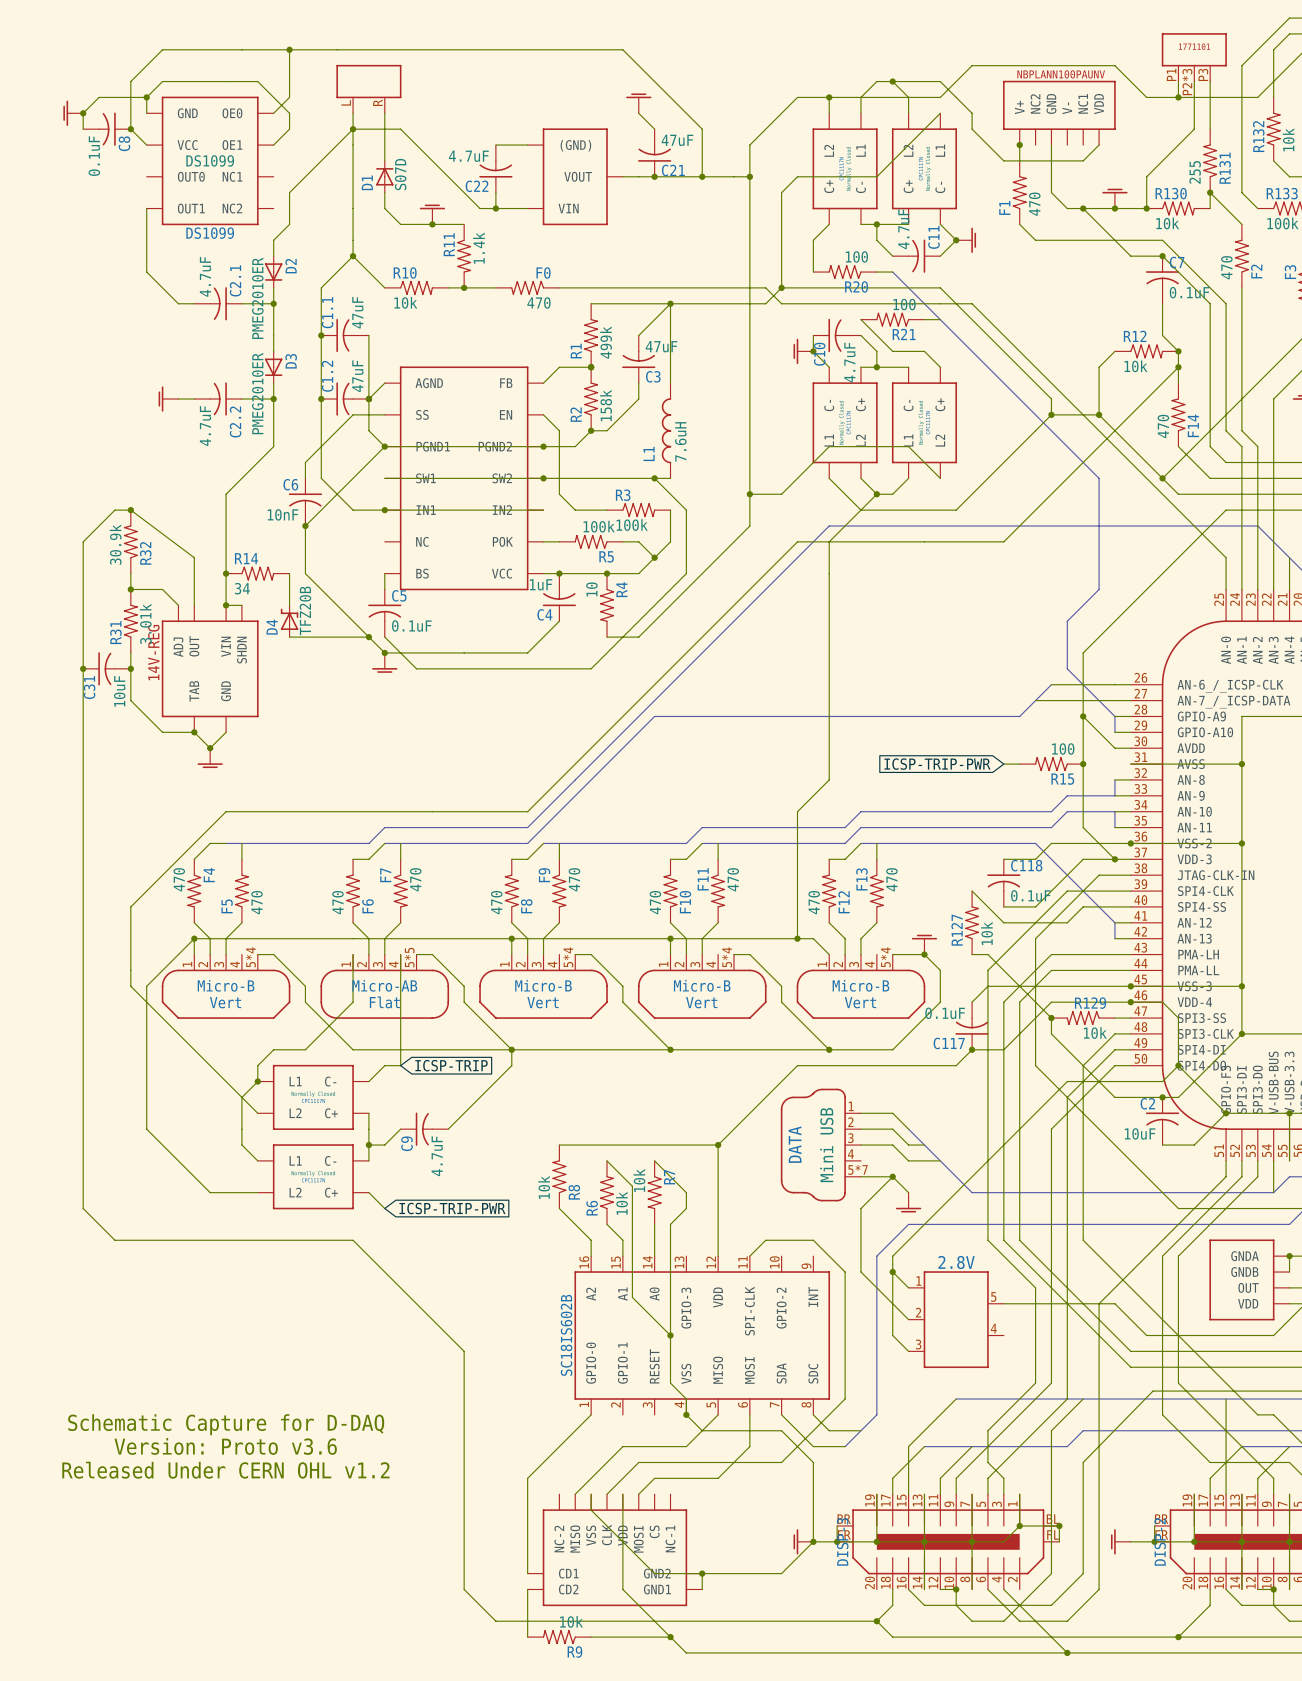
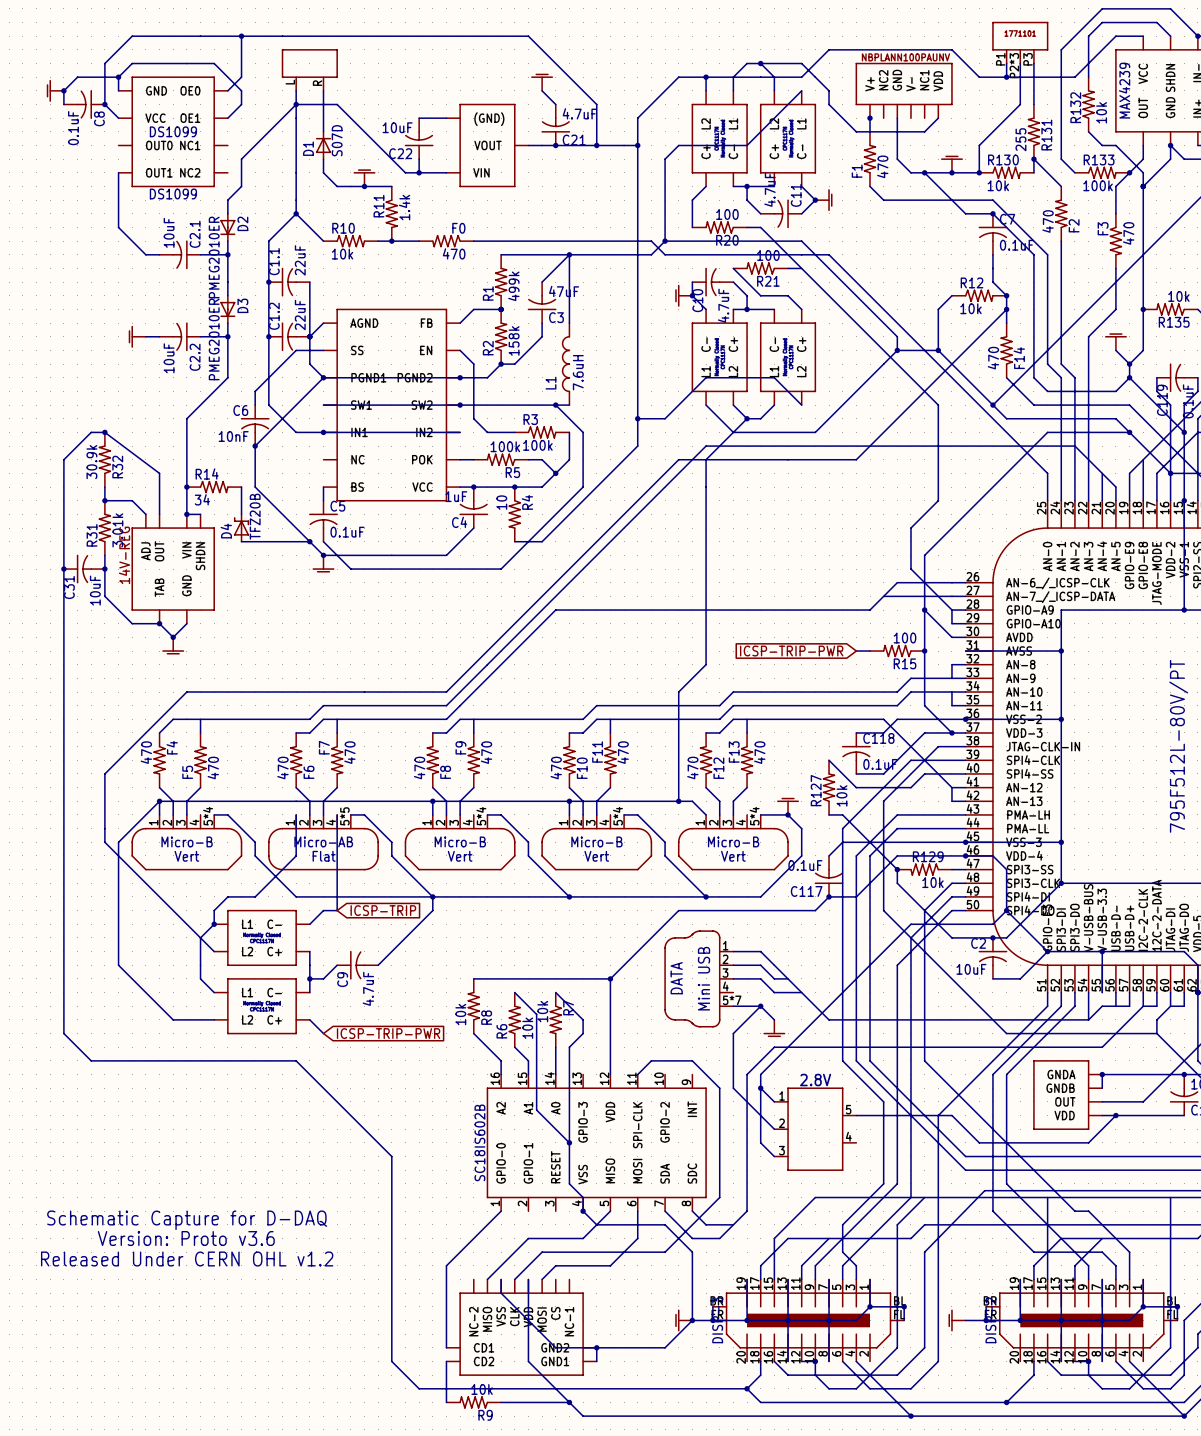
C21 value: 47uF (677, 140) -> 4.7uF (579, 113)
C22 value: 4.7uF (468, 156) -> 10uF (397, 127)
C2.1 value: 4.7uF (205, 276) -> 10uF (169, 232)
C1.1 value: 47uF (357, 312) -> 22uF (300, 260)
C1.2 value: 47uF (357, 376) -> 22uF (300, 315)
C2.2 value: 4.7uF (205, 426) -> 10uF (169, 358)

